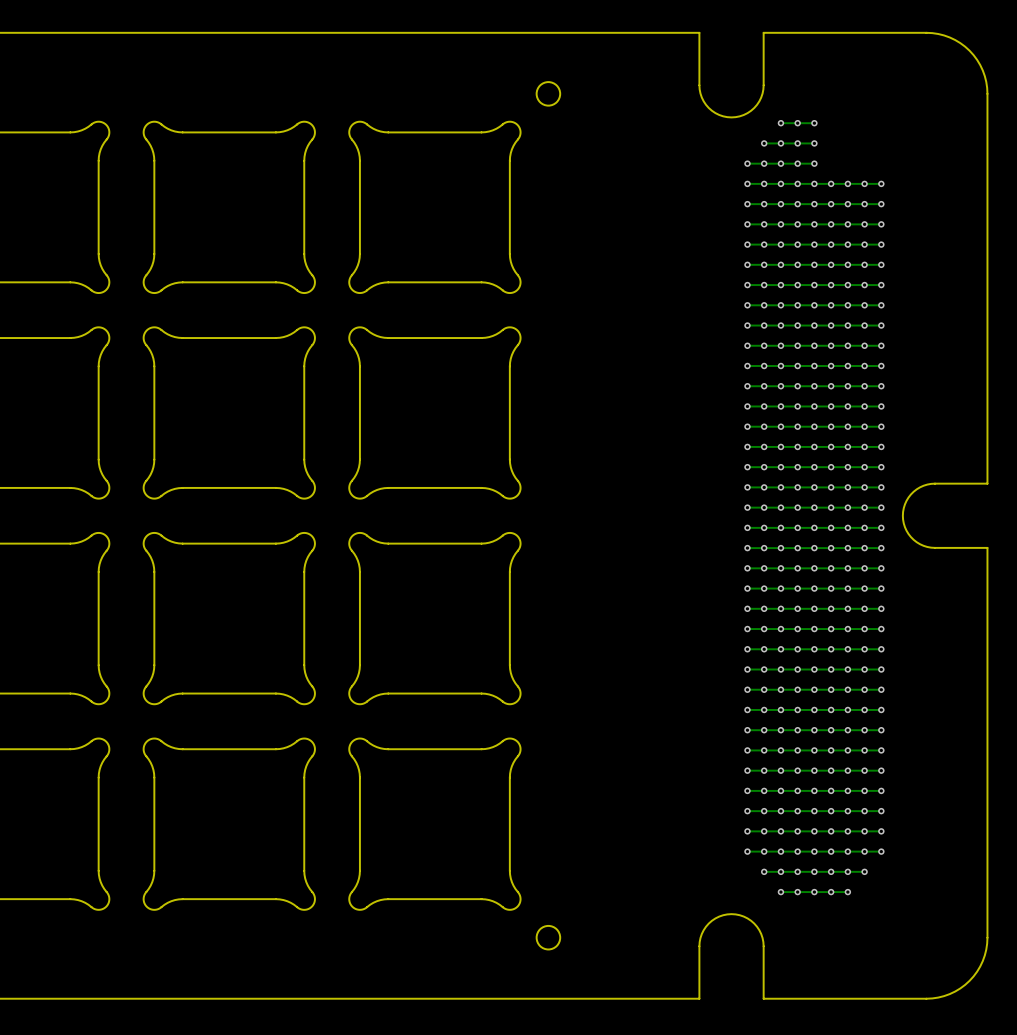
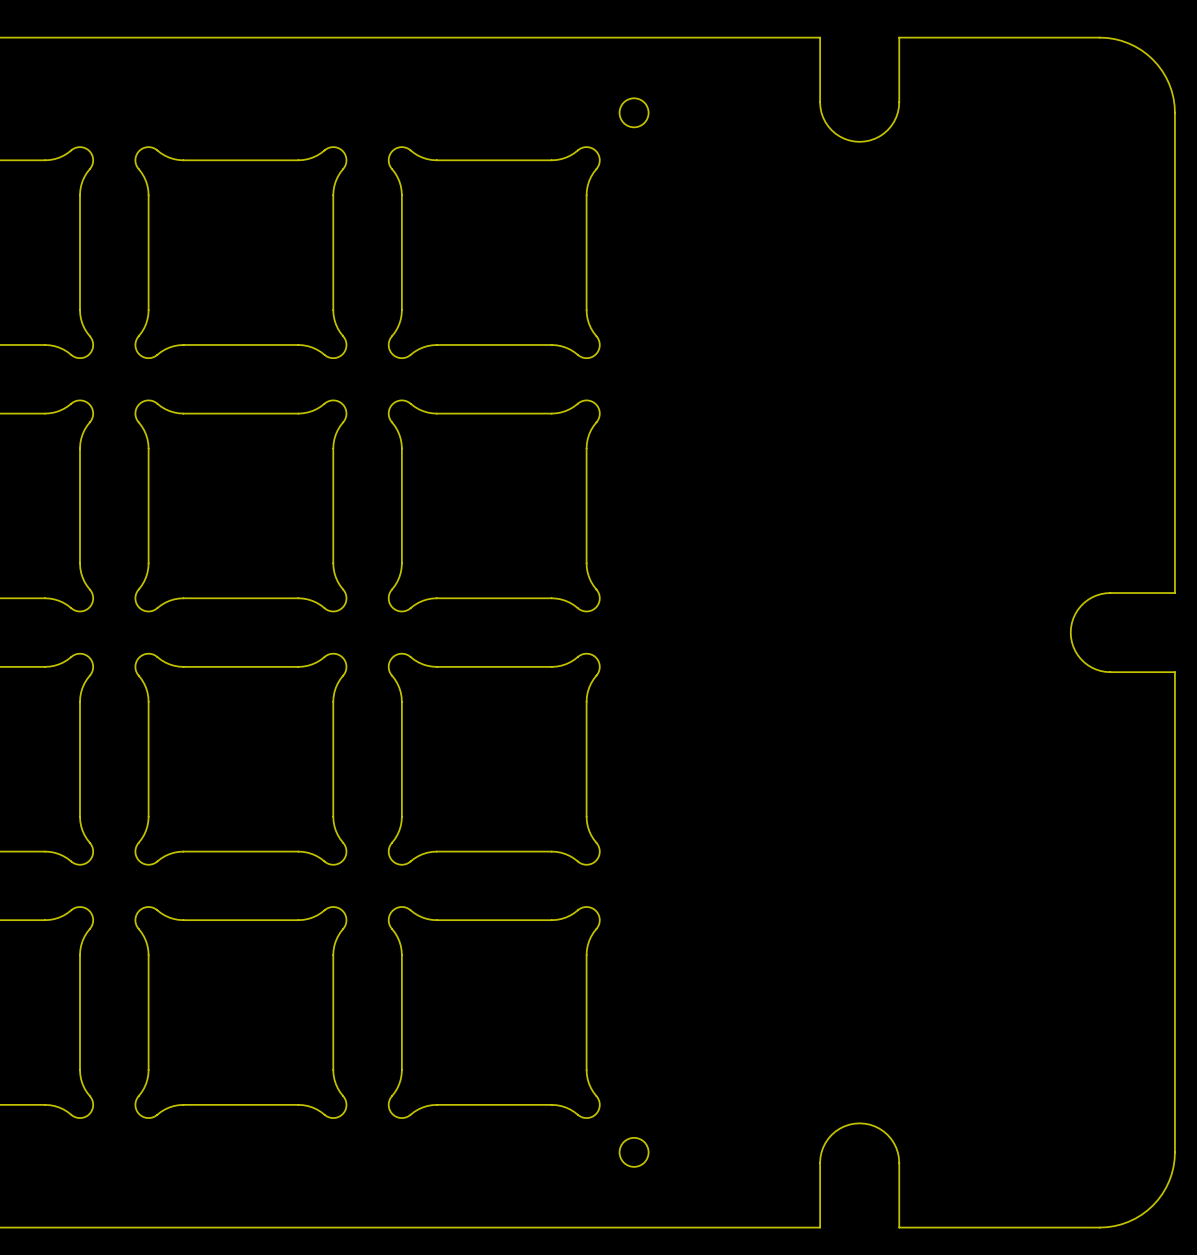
via: (780, 123) -> none
via: (797, 123) -> none
track: (814, 123) (780, 123) -> none
via: (814, 123) -> none
via: (764, 143) -> none
via: (780, 143) -> none
via: (797, 143) -> none
track: (814, 143) (764, 143) -> none
via: (814, 143) -> none
via: (747, 163) -> none
via: (764, 163) -> none
via: (780, 163) -> none
via: (797, 163) -> none
track: (814, 163) (747, 163) -> none
via: (814, 163) -> none
via: (747, 183) -> none
via: (764, 183) -> none
via: (780, 183) -> none
via: (797, 183) -> none
via: (814, 183) -> none
via: (831, 183) -> none
via: (847, 183) -> none
via: (864, 183) -> none
track: (881, 183) (747, 183) -> none
via: (881, 183) -> none
via: (747, 204) -> none
via: (764, 204) -> none
via: (780, 204) -> none
via: (797, 204) -> none
via: (814, 204) -> none
via: (831, 204) -> none
via: (847, 204) -> none
via: (864, 204) -> none
track: (881, 204) (747, 204) -> none
via: (881, 204) -> none
via: (747, 224) -> none
via: (764, 224) -> none
via: (780, 224) -> none
via: (797, 224) -> none
via: (814, 224) -> none
via: (831, 224) -> none
via: (847, 224) -> none
via: (864, 224) -> none
track: (881, 224) (747, 224) -> none
via: (881, 224) -> none
via: (747, 244) -> none
via: (764, 244) -> none
via: (780, 244) -> none
via: (797, 244) -> none
via: (814, 244) -> none
via: (831, 244) -> none
via: (847, 244) -> none
via: (864, 244) -> none
track: (881, 244) (747, 244) -> none
via: (881, 244) -> none
via: (747, 264) -> none
via: (764, 264) -> none
via: (780, 264) -> none
via: (797, 264) -> none
via: (814, 264) -> none
via: (831, 264) -> none
via: (847, 264) -> none
via: (864, 264) -> none
track: (881, 264) (747, 264) -> none
via: (881, 264) -> none
via: (747, 285) -> none
via: (764, 285) -> none
via: (780, 285) -> none
via: (797, 285) -> none
via: (814, 285) -> none
via: (831, 285) -> none
via: (847, 285) -> none
via: (864, 285) -> none
track: (881, 285) (747, 285) -> none
via: (881, 285) -> none
via: (747, 305) -> none
via: (764, 305) -> none
via: (780, 305) -> none
via: (797, 305) -> none
via: (814, 305) -> none
via: (831, 305) -> none
via: (847, 305) -> none
via: (864, 305) -> none
track: (881, 305) (747, 305) -> none
via: (881, 305) -> none
via: (747, 325) -> none
via: (764, 325) -> none
via: (780, 325) -> none
via: (797, 325) -> none
via: (814, 325) -> none
via: (831, 325) -> none
via: (847, 325) -> none
via: (864, 325) -> none
track: (881, 325) (747, 325) -> none
via: (881, 325) -> none
via: (747, 345) -> none
via: (764, 345) -> none
via: (780, 345) -> none
via: (797, 345) -> none
via: (814, 345) -> none
via: (831, 345) -> none
via: (847, 345) -> none
via: (864, 345) -> none
track: (881, 345) (747, 345) -> none
via: (881, 345) -> none
via: (747, 366) -> none
via: (764, 366) -> none
via: (780, 366) -> none
via: (797, 366) -> none
via: (814, 366) -> none
via: (831, 366) -> none
via: (847, 366) -> none
via: (864, 366) -> none
track: (881, 366) (747, 366) -> none
via: (881, 366) -> none
via: (747, 386) -> none
via: (764, 386) -> none
via: (780, 386) -> none
via: (797, 386) -> none
via: (814, 386) -> none
via: (831, 386) -> none
via: (847, 386) -> none
via: (864, 386) -> none
track: (881, 386) (747, 386) -> none
via: (881, 386) -> none
via: (747, 406) -> none
via: (764, 406) -> none
via: (780, 406) -> none
via: (797, 406) -> none
via: (814, 406) -> none
via: (831, 406) -> none
via: (847, 406) -> none
via: (864, 406) -> none
track: (881, 406) (747, 406) -> none
via: (881, 406) -> none
via: (747, 426) -> none
via: (764, 426) -> none
via: (780, 426) -> none
via: (797, 426) -> none
via: (814, 426) -> none
via: (831, 426) -> none
via: (847, 426) -> none
via: (864, 426) -> none
track: (881, 426) (747, 426) -> none
via: (881, 426) -> none
via: (747, 446) -> none
via: (764, 446) -> none
via: (780, 446) -> none
via: (797, 446) -> none
via: (814, 446) -> none
via: (831, 446) -> none
via: (847, 446) -> none
via: (864, 446) -> none
track: (881, 446) (747, 446) -> none
via: (881, 446) -> none
via: (747, 467) -> none
via: (764, 467) -> none
via: (780, 467) -> none
via: (797, 467) -> none
via: (814, 467) -> none
via: (831, 467) -> none
via: (847, 467) -> none
via: (864, 467) -> none
track: (881, 467) (747, 467) -> none
via: (881, 467) -> none
via: (747, 487) -> none
via: (764, 487) -> none
via: (780, 487) -> none
via: (797, 487) -> none
via: (814, 487) -> none
via: (831, 487) -> none
via: (847, 487) -> none
via: (864, 487) -> none
track: (881, 487) (747, 487) -> none
via: (881, 487) -> none
via: (747, 507) -> none
via: (764, 507) -> none
via: (780, 507) -> none
via: (797, 507) -> none
via: (814, 507) -> none
via: (831, 507) -> none
via: (847, 507) -> none
via: (864, 507) -> none
track: (881, 507) (747, 507) -> none
via: (881, 507) -> none
via: (747, 527) -> none
via: (764, 527) -> none
via: (780, 527) -> none
via: (797, 527) -> none
via: (814, 527) -> none
via: (831, 527) -> none
via: (847, 527) -> none
via: (864, 527) -> none
track: (881, 527) (747, 527) -> none
via: (881, 527) -> none
via: (747, 548) -> none
via: (764, 548) -> none
via: (780, 548) -> none
via: (797, 548) -> none
via: (814, 548) -> none
via: (831, 548) -> none
via: (847, 548) -> none
via: (864, 548) -> none
track: (881, 548) (747, 548) -> none
via: (881, 548) -> none
via: (747, 568) -> none
via: (764, 568) -> none
via: (780, 568) -> none
via: (797, 568) -> none
via: (814, 568) -> none
via: (831, 568) -> none
via: (847, 568) -> none
via: (864, 568) -> none
track: (881, 568) (747, 568) -> none
via: (881, 568) -> none
via: (747, 588) -> none
via: (764, 588) -> none
via: (780, 588) -> none
via: (797, 588) -> none
via: (814, 588) -> none
via: (831, 588) -> none
via: (847, 588) -> none
via: (864, 588) -> none
track: (881, 588) (747, 588) -> none
via: (881, 588) -> none
via: (747, 608) -> none
via: (764, 608) -> none
via: (780, 608) -> none
via: (797, 608) -> none
via: (814, 608) -> none
via: (831, 608) -> none
via: (847, 608) -> none
via: (864, 608) -> none
track: (881, 608) (747, 608) -> none
via: (881, 608) -> none
via: (747, 629) -> none
via: (764, 629) -> none
via: (780, 629) -> none
via: (797, 629) -> none
via: (814, 629) -> none
via: (831, 629) -> none
via: (847, 629) -> none
via: (864, 629) -> none
track: (881, 629) (747, 629) -> none
via: (881, 629) -> none
via: (747, 649) -> none
via: (764, 649) -> none
via: (780, 649) -> none
via: (797, 649) -> none
via: (814, 649) -> none
via: (831, 649) -> none
via: (847, 649) -> none
via: (864, 649) -> none
track: (881, 649) (747, 649) -> none
via: (881, 649) -> none
via: (747, 669) -> none
via: (764, 669) -> none
via: (780, 669) -> none
via: (797, 669) -> none
via: (814, 669) -> none
via: (831, 669) -> none
via: (847, 669) -> none
via: (864, 669) -> none
track: (881, 669) (747, 669) -> none
via: (881, 669) -> none
via: (747, 689) -> none
via: (764, 689) -> none
via: (780, 689) -> none
via: (797, 689) -> none
via: (814, 689) -> none
via: (831, 689) -> none
via: (847, 689) -> none
via: (864, 689) -> none
track: (881, 689) (747, 689) -> none
via: (881, 689) -> none
via: (747, 709) -> none
via: (764, 709) -> none
via: (780, 709) -> none
via: (797, 709) -> none
via: (814, 709) -> none
via: (831, 709) -> none
via: (847, 709) -> none
via: (864, 709) -> none
track: (881, 709) (747, 709) -> none
via: (881, 709) -> none
via: (747, 730) -> none
via: (764, 730) -> none
via: (780, 730) -> none
via: (797, 730) -> none
via: (814, 730) -> none
via: (831, 730) -> none
via: (847, 730) -> none
via: (864, 730) -> none
track: (881, 730) (747, 730) -> none
via: (881, 730) -> none
via: (747, 750) -> none
via: (764, 750) -> none
via: (780, 750) -> none
via: (797, 750) -> none
via: (814, 750) -> none
via: (831, 750) -> none
via: (847, 750) -> none
via: (864, 750) -> none
track: (881, 750) (747, 750) -> none
via: (881, 750) -> none
via: (747, 770) -> none
via: (764, 770) -> none
via: (780, 770) -> none
via: (797, 770) -> none
via: (814, 770) -> none
via: (831, 770) -> none
via: (847, 770) -> none
via: (864, 770) -> none
track: (881, 770) (747, 770) -> none
via: (881, 770) -> none
via: (747, 790) -> none
via: (764, 790) -> none
via: (780, 790) -> none
via: (797, 790) -> none
via: (814, 790) -> none
via: (831, 790) -> none
via: (847, 790) -> none
via: (864, 790) -> none
track: (881, 790) (747, 790) -> none
via: (881, 790) -> none
via: (747, 811) -> none
via: (764, 811) -> none
via: (780, 811) -> none
via: (797, 811) -> none
via: (814, 811) -> none
via: (831, 811) -> none
via: (847, 811) -> none
via: (864, 811) -> none
track: (881, 811) (747, 811) -> none
via: (881, 811) -> none
via: (747, 831) -> none
via: (764, 831) -> none
via: (780, 831) -> none
via: (797, 831) -> none
via: (814, 831) -> none
via: (831, 831) -> none
via: (847, 831) -> none
via: (864, 831) -> none
track: (881, 831) (747, 831) -> none
via: (881, 831) -> none
via: (747, 851) -> none
via: (764, 851) -> none
via: (780, 851) -> none
via: (797, 851) -> none
via: (814, 851) -> none
via: (831, 851) -> none
via: (847, 851) -> none
via: (864, 851) -> none
track: (881, 851) (747, 851) -> none
via: (881, 851) -> none
via: (764, 871) -> none
via: (780, 871) -> none
via: (797, 871) -> none
via: (814, 871) -> none
via: (831, 871) -> none
via: (847, 871) -> none
track: (864, 871) (764, 871) -> none
via: (864, 871) -> none
via: (780, 892) -> none
via: (797, 892) -> none
via: (814, 892) -> none
via: (831, 892) -> none
track: (847, 892) (780, 892) -> none
via: (847, 892) -> none

